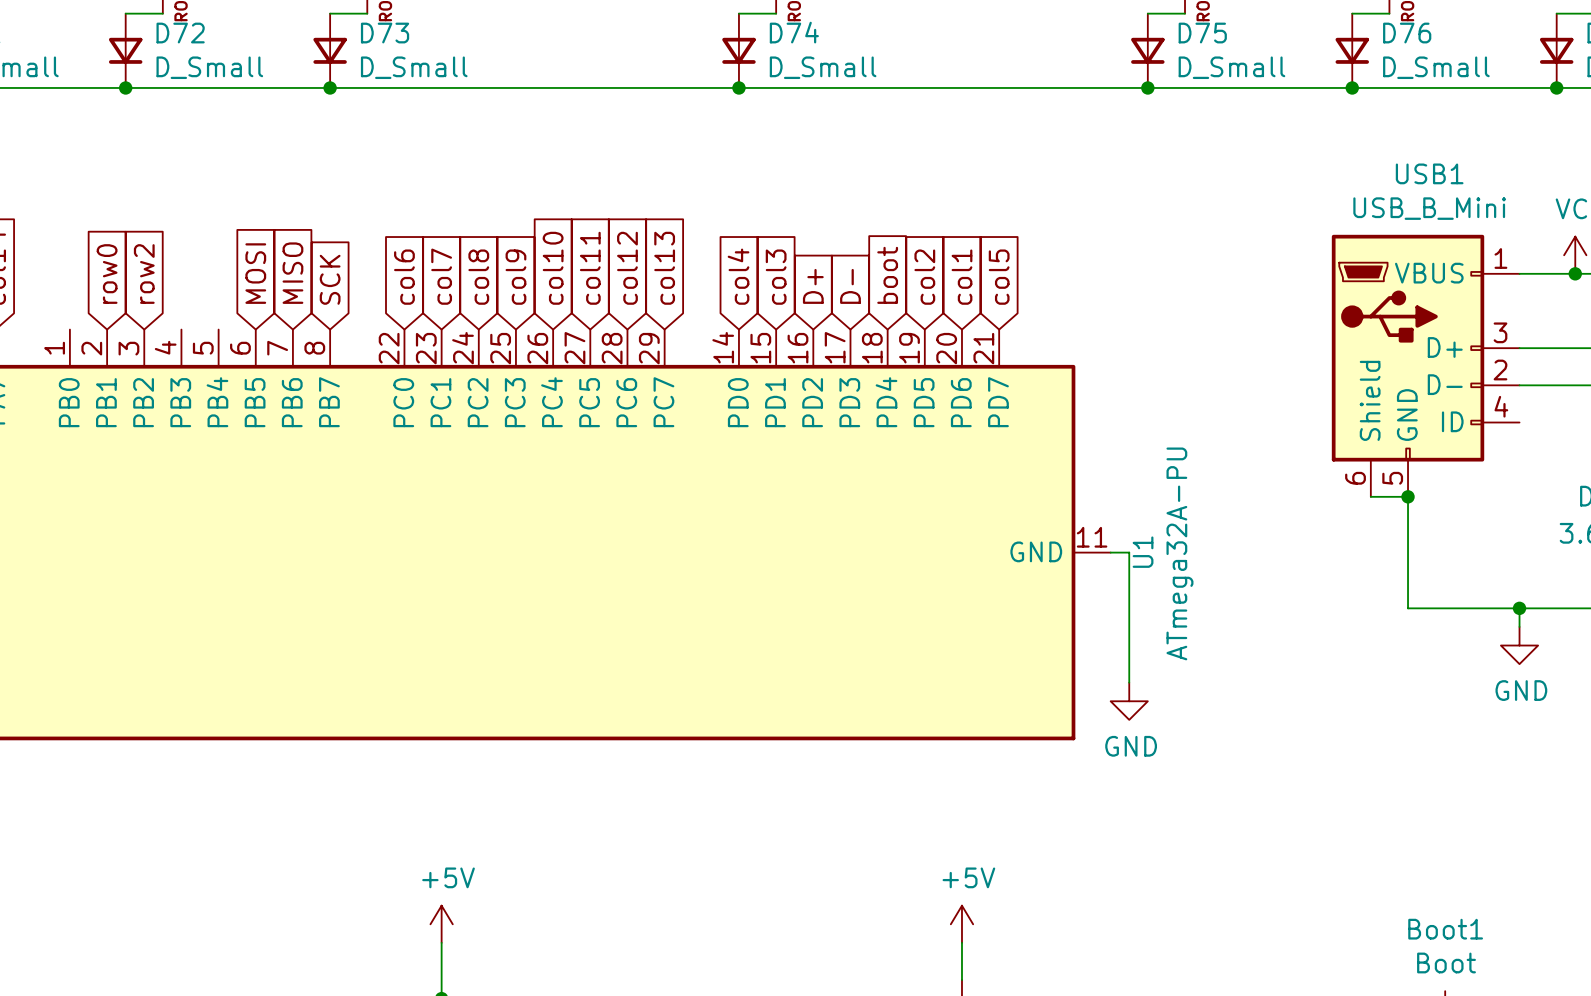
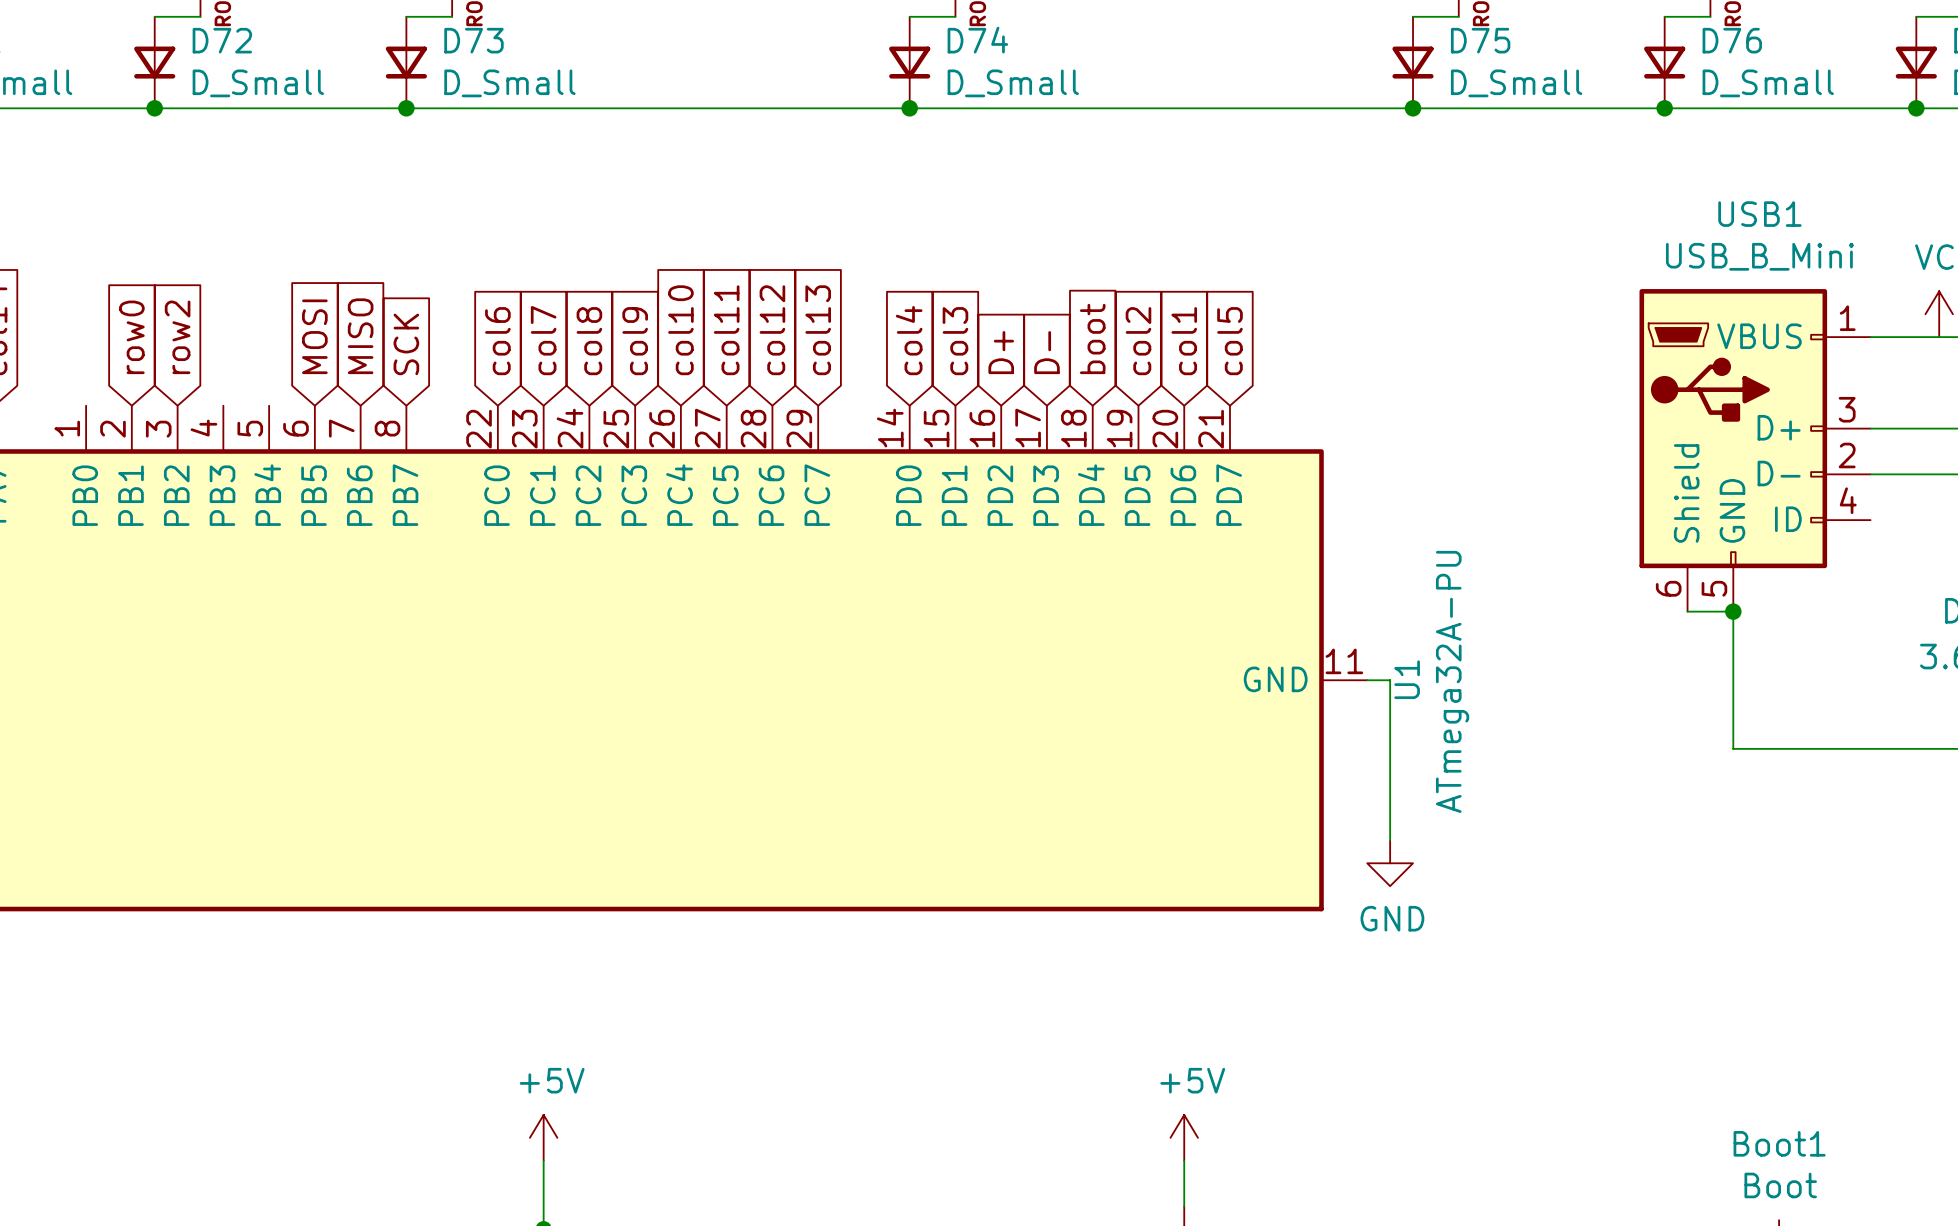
junction: (1575, 273) -> none
wire: (1519, 608) (1519, 626) -> none
junction: (1519, 608) -> none
power symbol: GND (1519, 645) -> none

